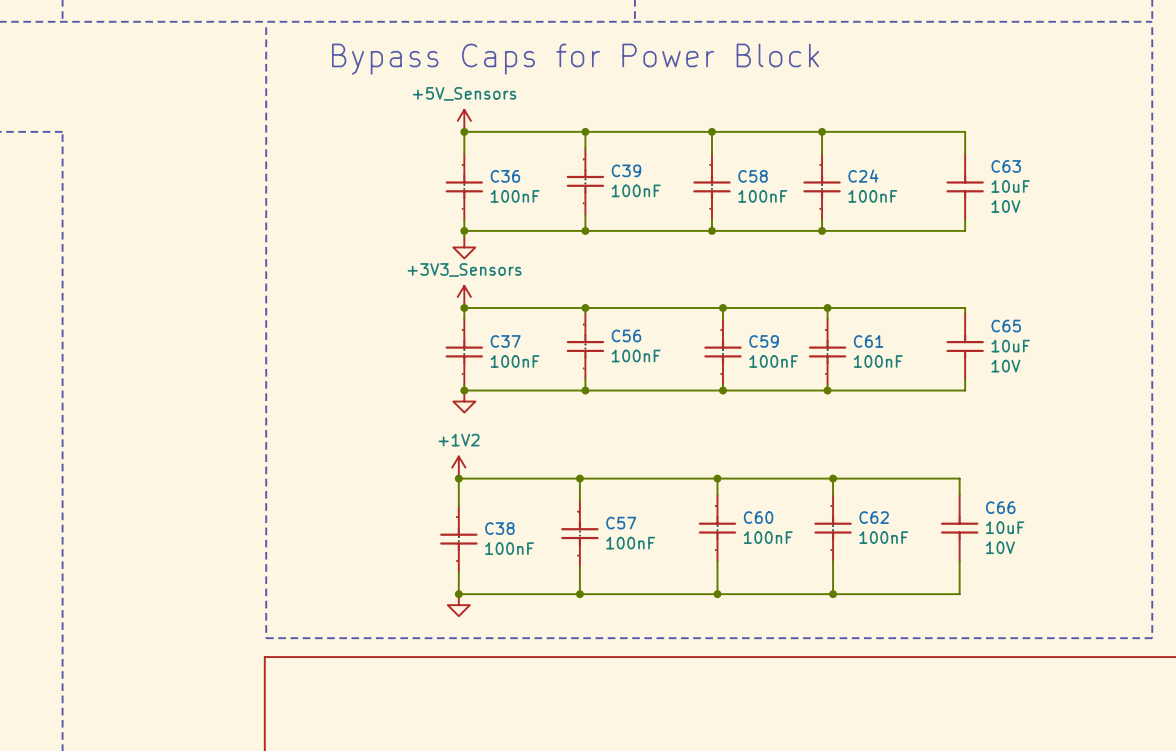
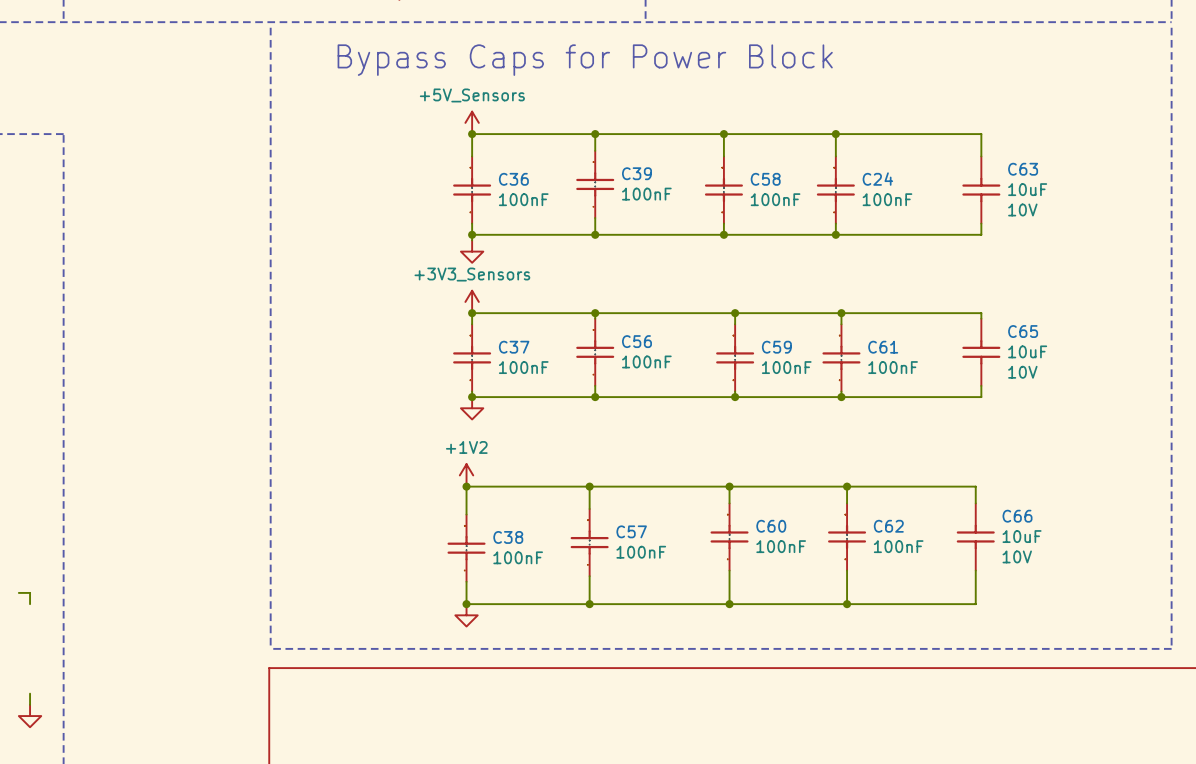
wire: none -> (18, 592) (30, 592) (30, 604)
wire: none -> (30, 693) (30, 704)
power symbol: none -> (30, 716)

